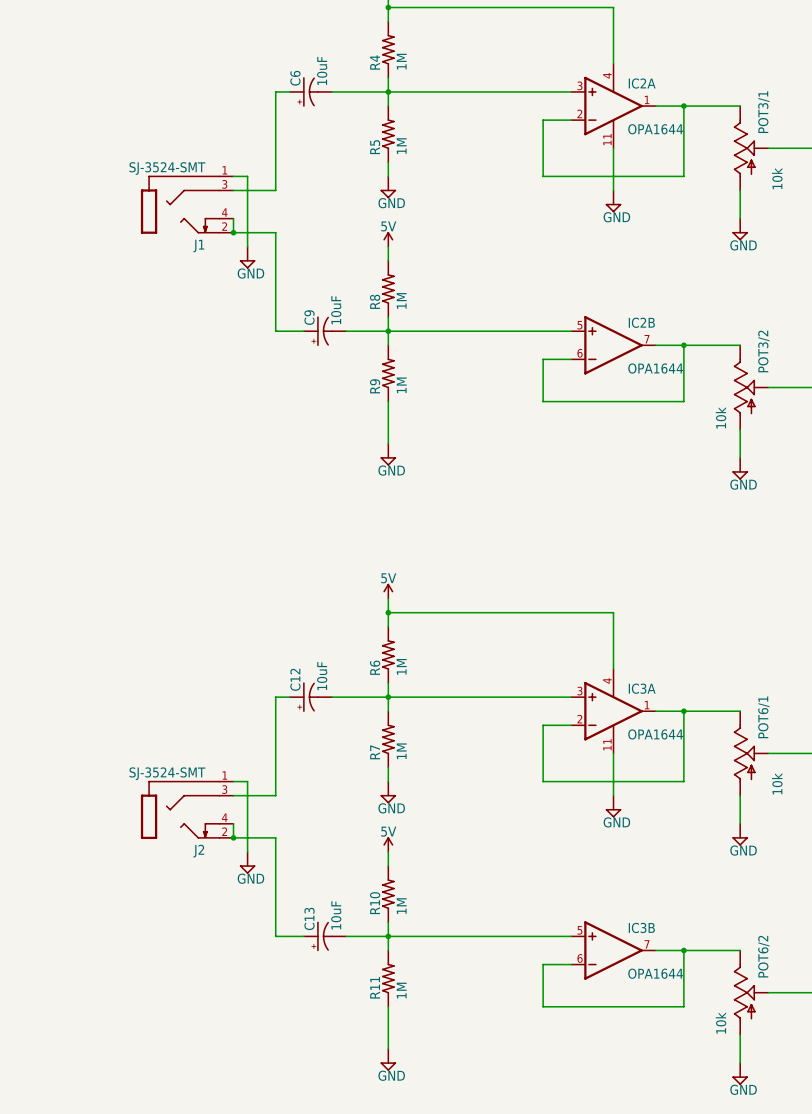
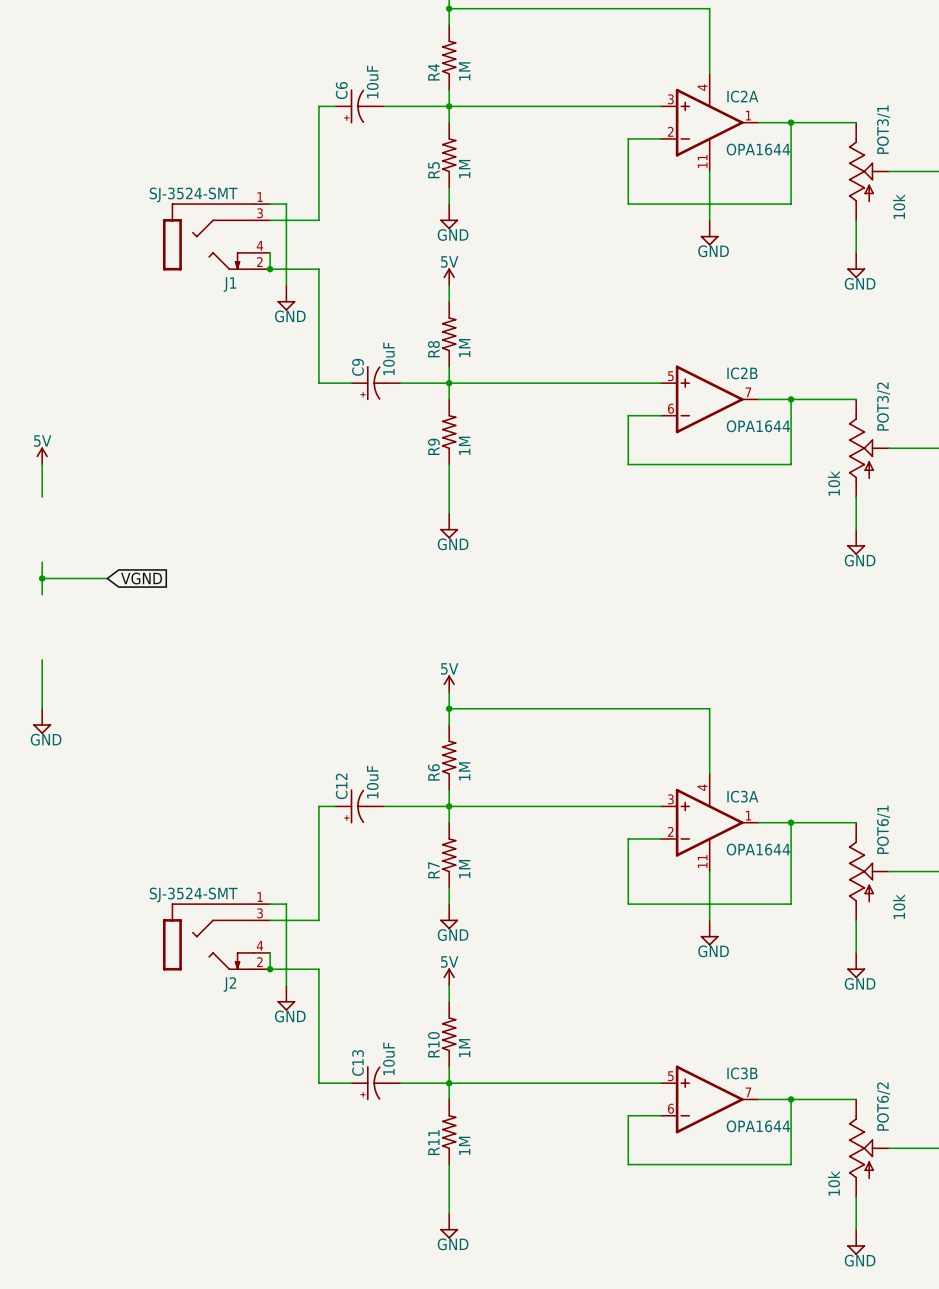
power symbol: none -> 5V (42, 455)
wire: none -> (42, 464) (42, 497)
wire: none -> (42, 562) (42, 594)
wire: none -> (42, 578) (107, 578)
junction: none -> (42, 578)
global label: none -> VGND (141, 578)
wire: none -> (42, 659) (42, 708)
power symbol: none -> GND (42, 721)

